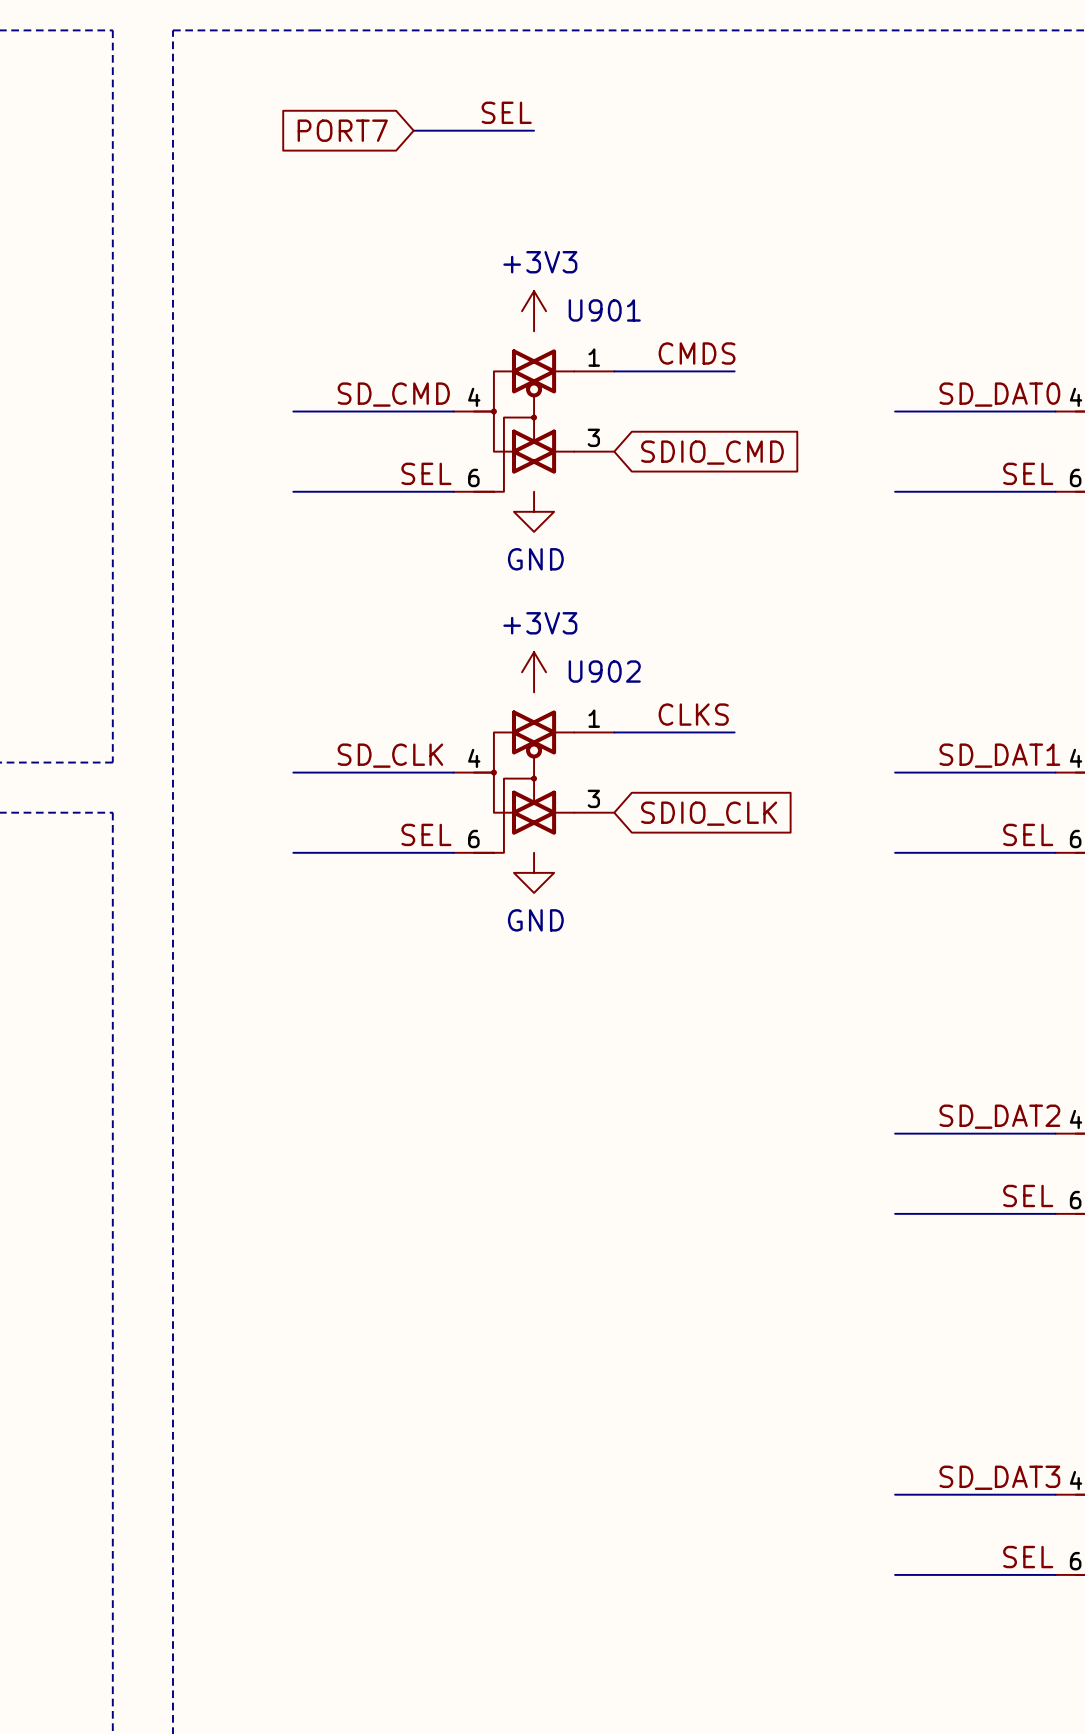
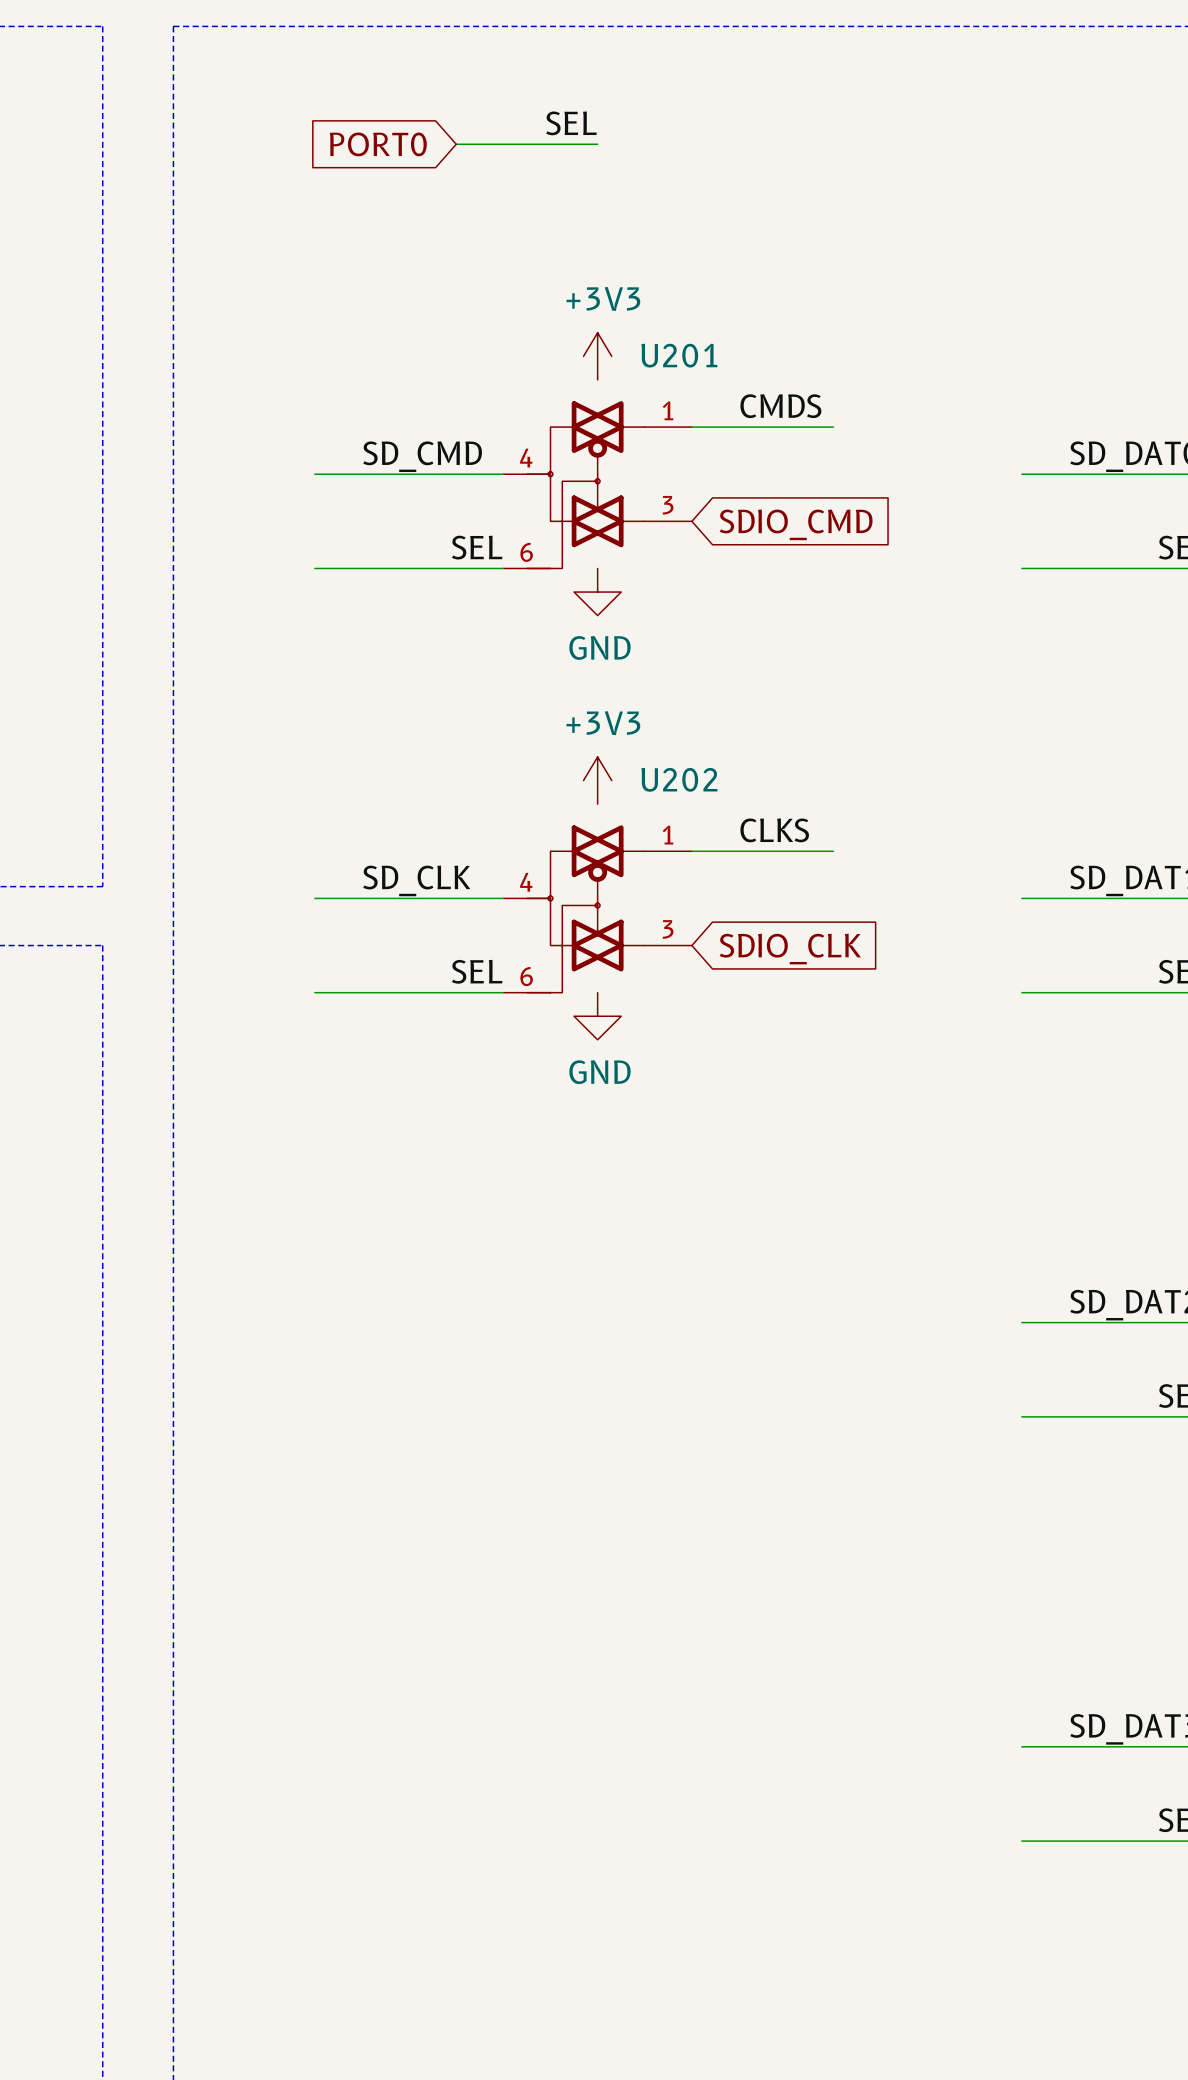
global label: PORT7 (342, 130) -> PORT0 (378, 144)
U901 name: U901 (604, 310) -> U201 (679, 355)
U902 name: U902 (604, 671) -> U202 (679, 779)

